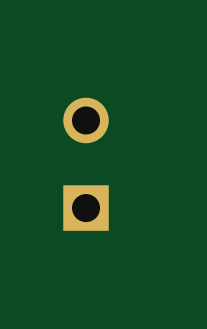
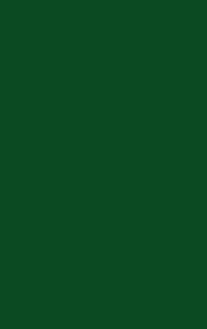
part: (86, 164) -> none

